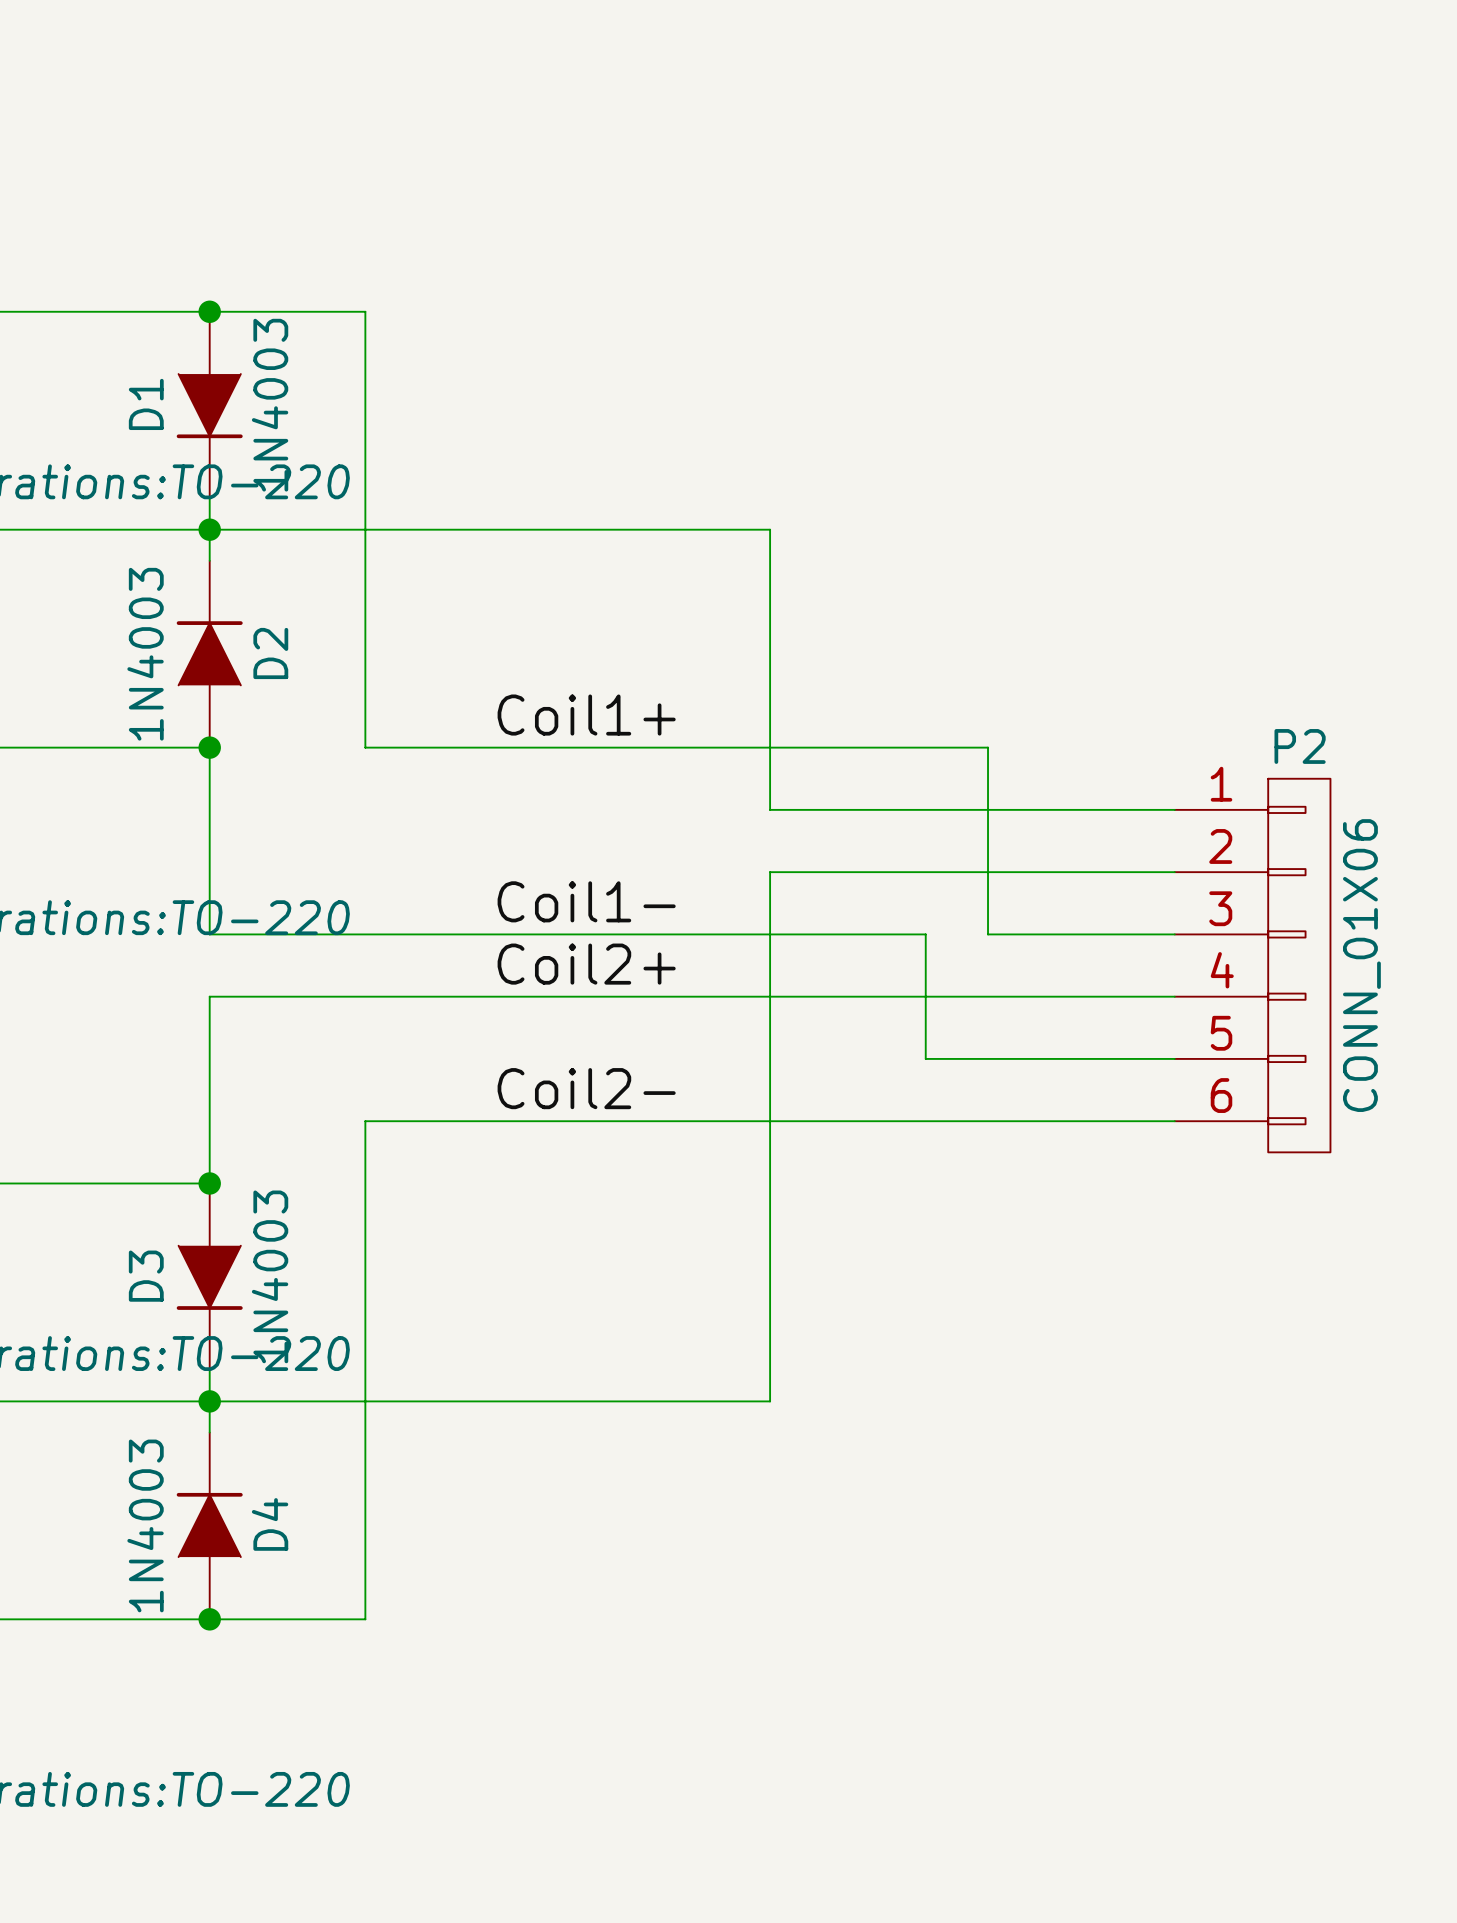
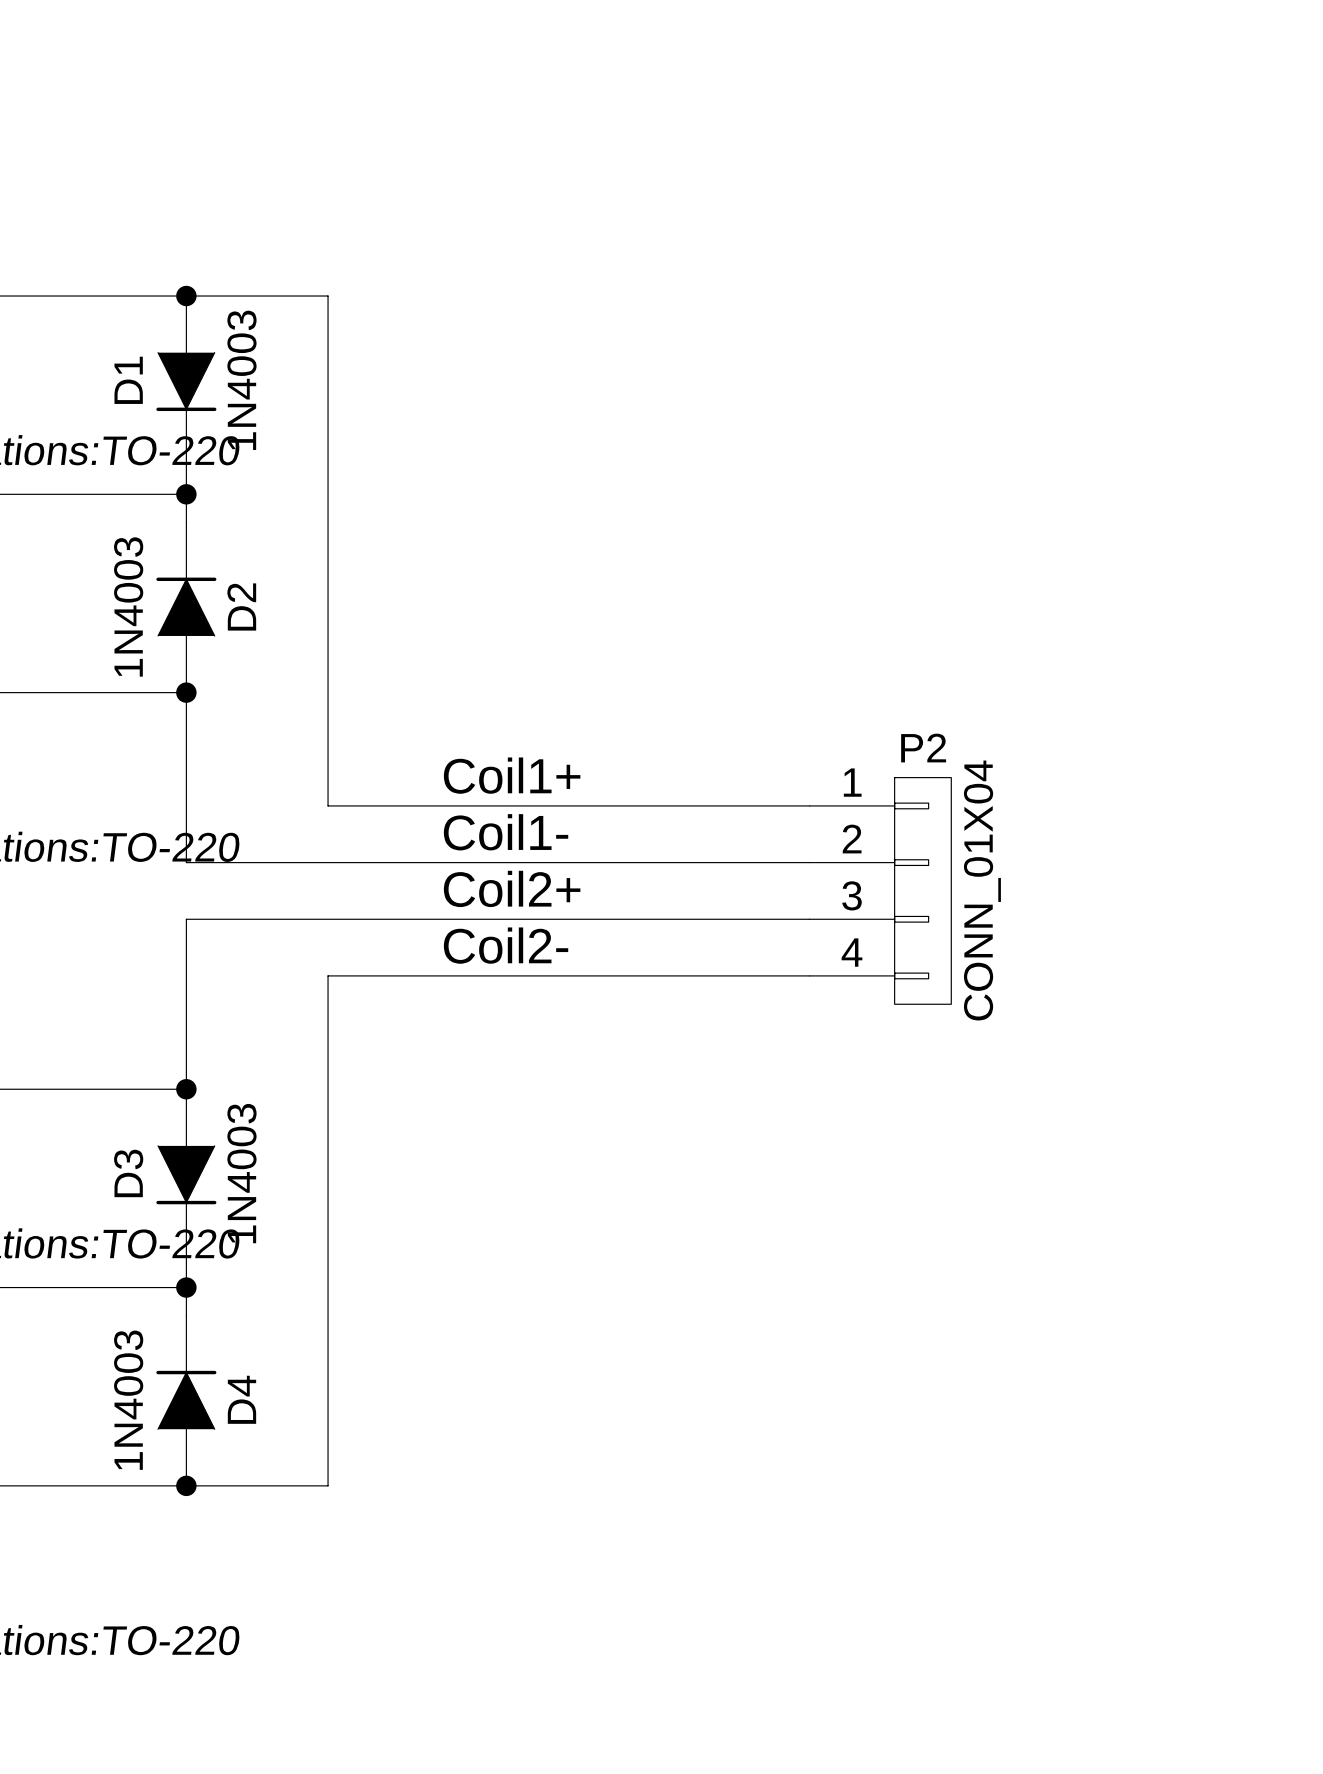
wire: (209, 529) (770, 529) (770, 809) (1174, 809) -> none
label position: Coil1+ (586, 715) -> Coil1+ (512, 775)
P2 name position: P2 (1300, 746) -> P2 (923, 748)
wire: (365, 747) (988, 747) (988, 934) (1174, 934) -> (328, 692) (328, 805) (696, 805)
P2 symbol: [1174, 778, 1331, 1153] -> [809, 777, 952, 1005]
wire: (770, 872) (770, 1401) (209, 1401) -> none
wire: (894, 872) (1174, 872) -> none
wire: (894, 934) (925, 934) (925, 1058) (1174, 1058) -> none
P2 value: CONN_01X06 (1361, 965) -> CONN_01X04 (982, 890)
wire: (894, 996) (1174, 996) -> none
label position: Coil2- (586, 1088) -> Coil2- (506, 945)
wire: (365, 1121) (1174, 1121) -> (328, 1032) (328, 975) (809, 975)

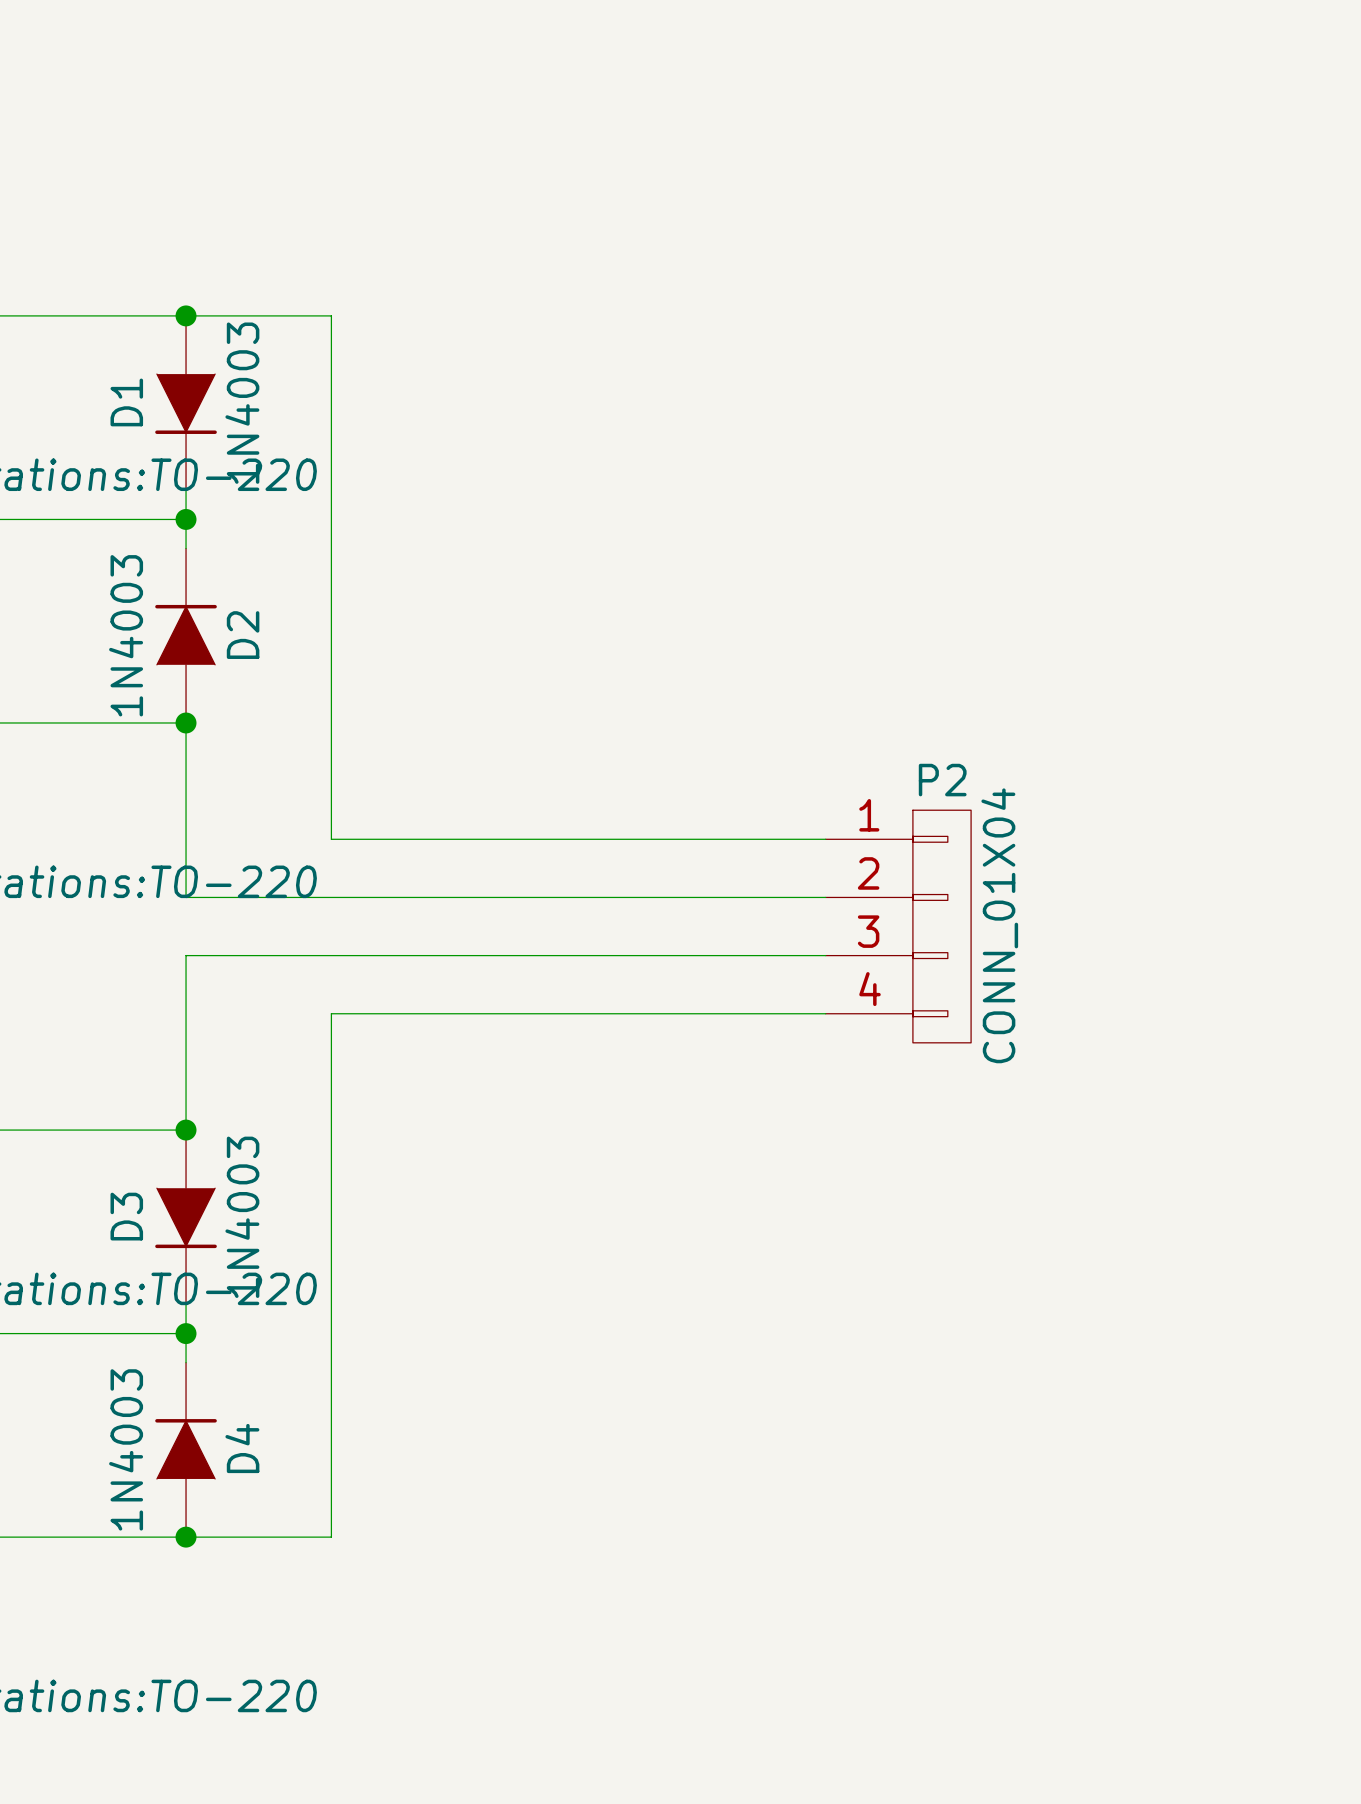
label: Coil1+ (512, 775) -> none
label: Coil1- (506, 832) -> none
label: Coil2+ (512, 888) -> none
label: Coil2- (506, 945) -> none

